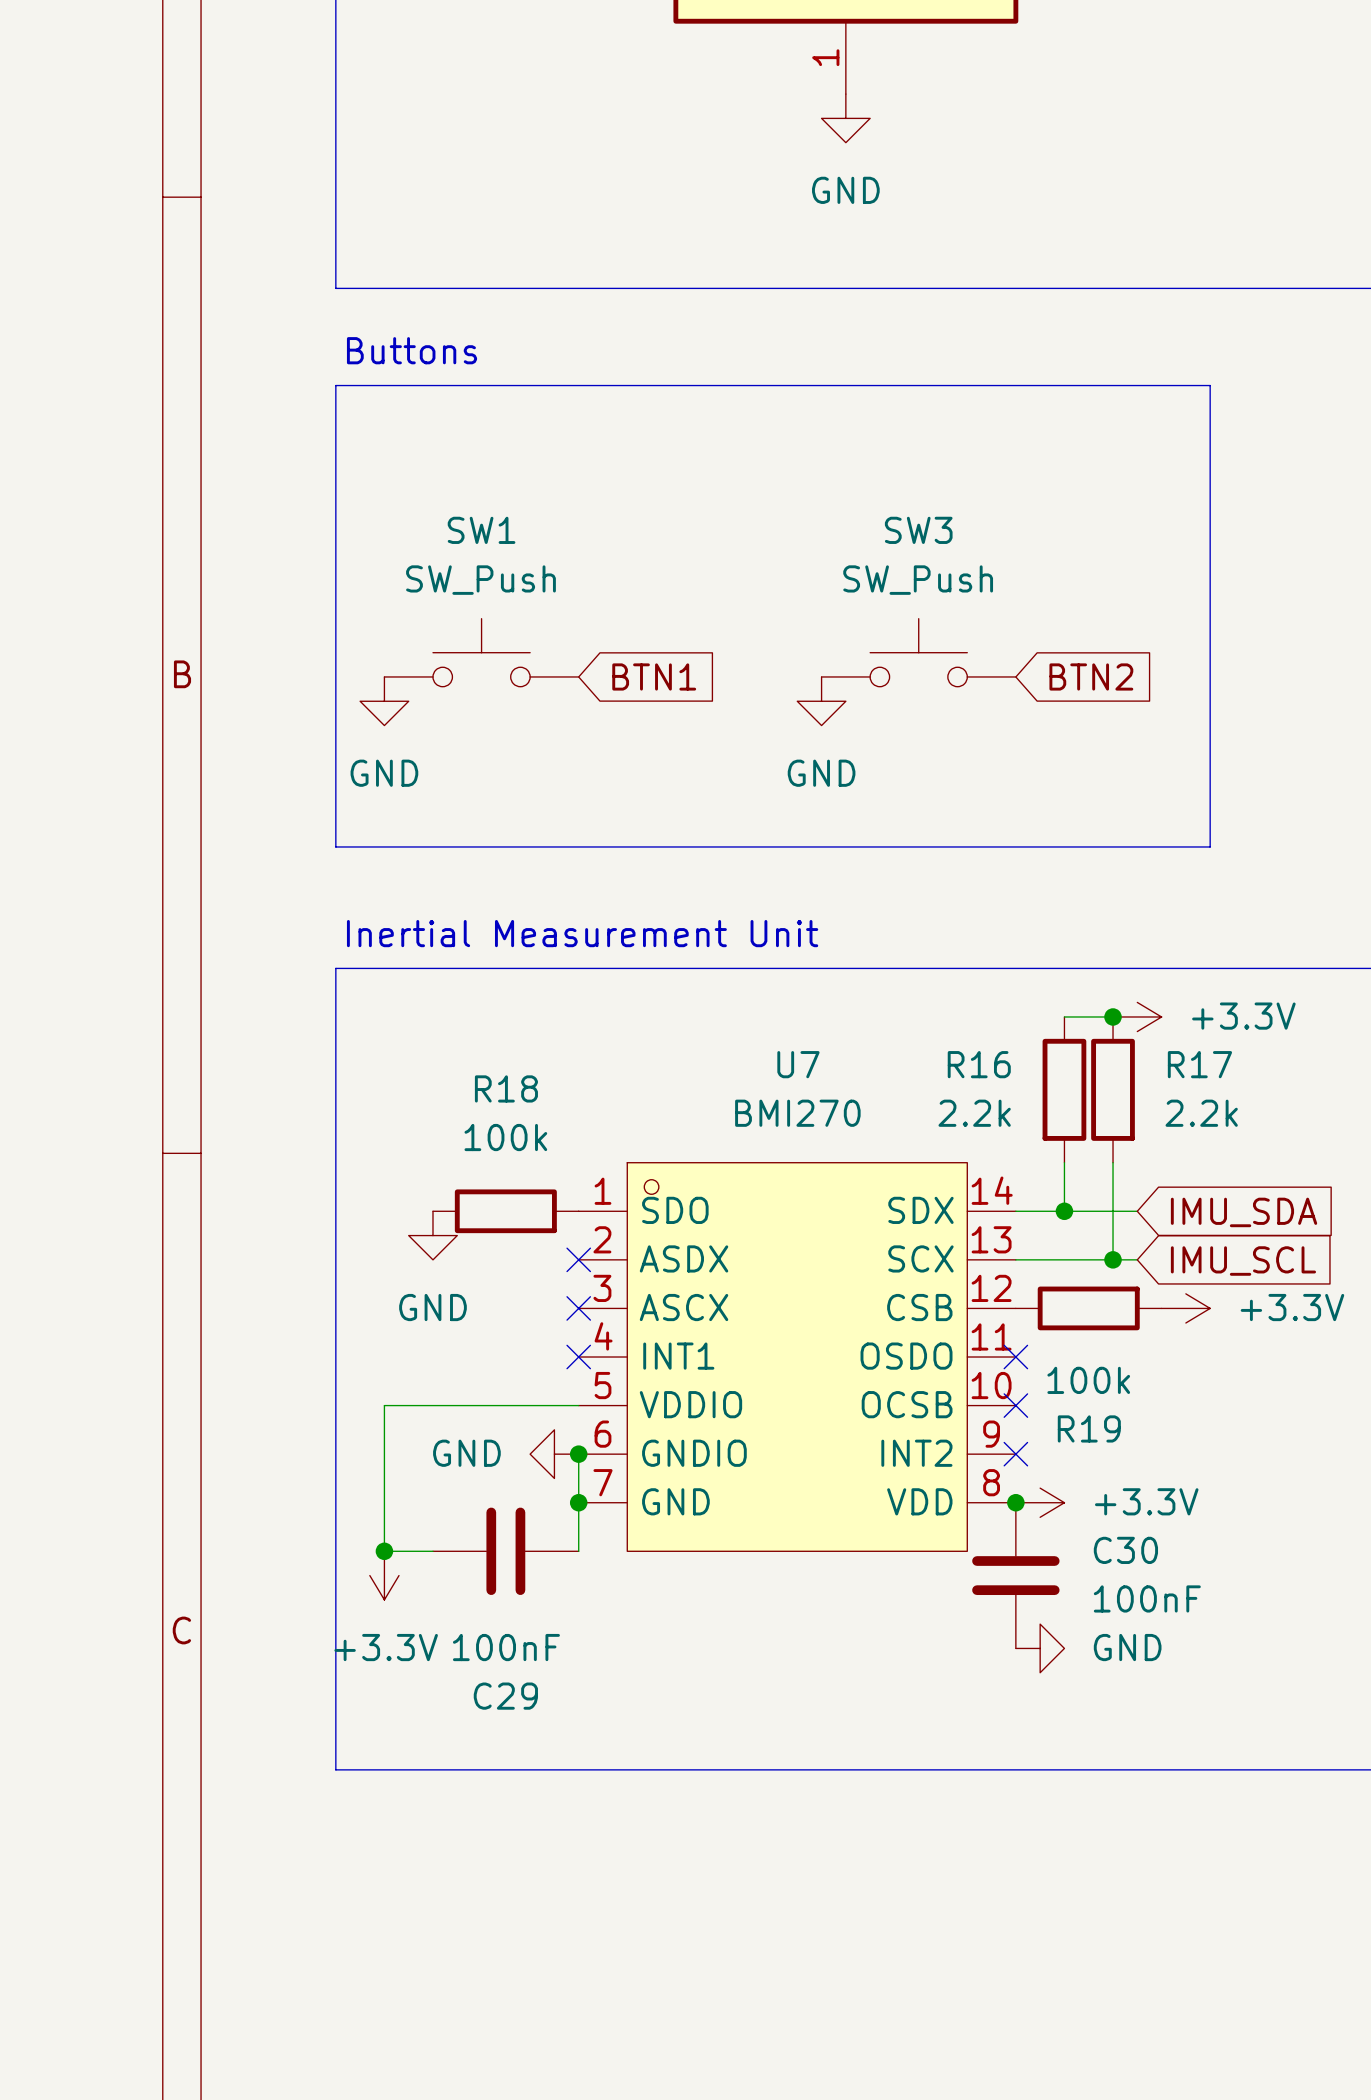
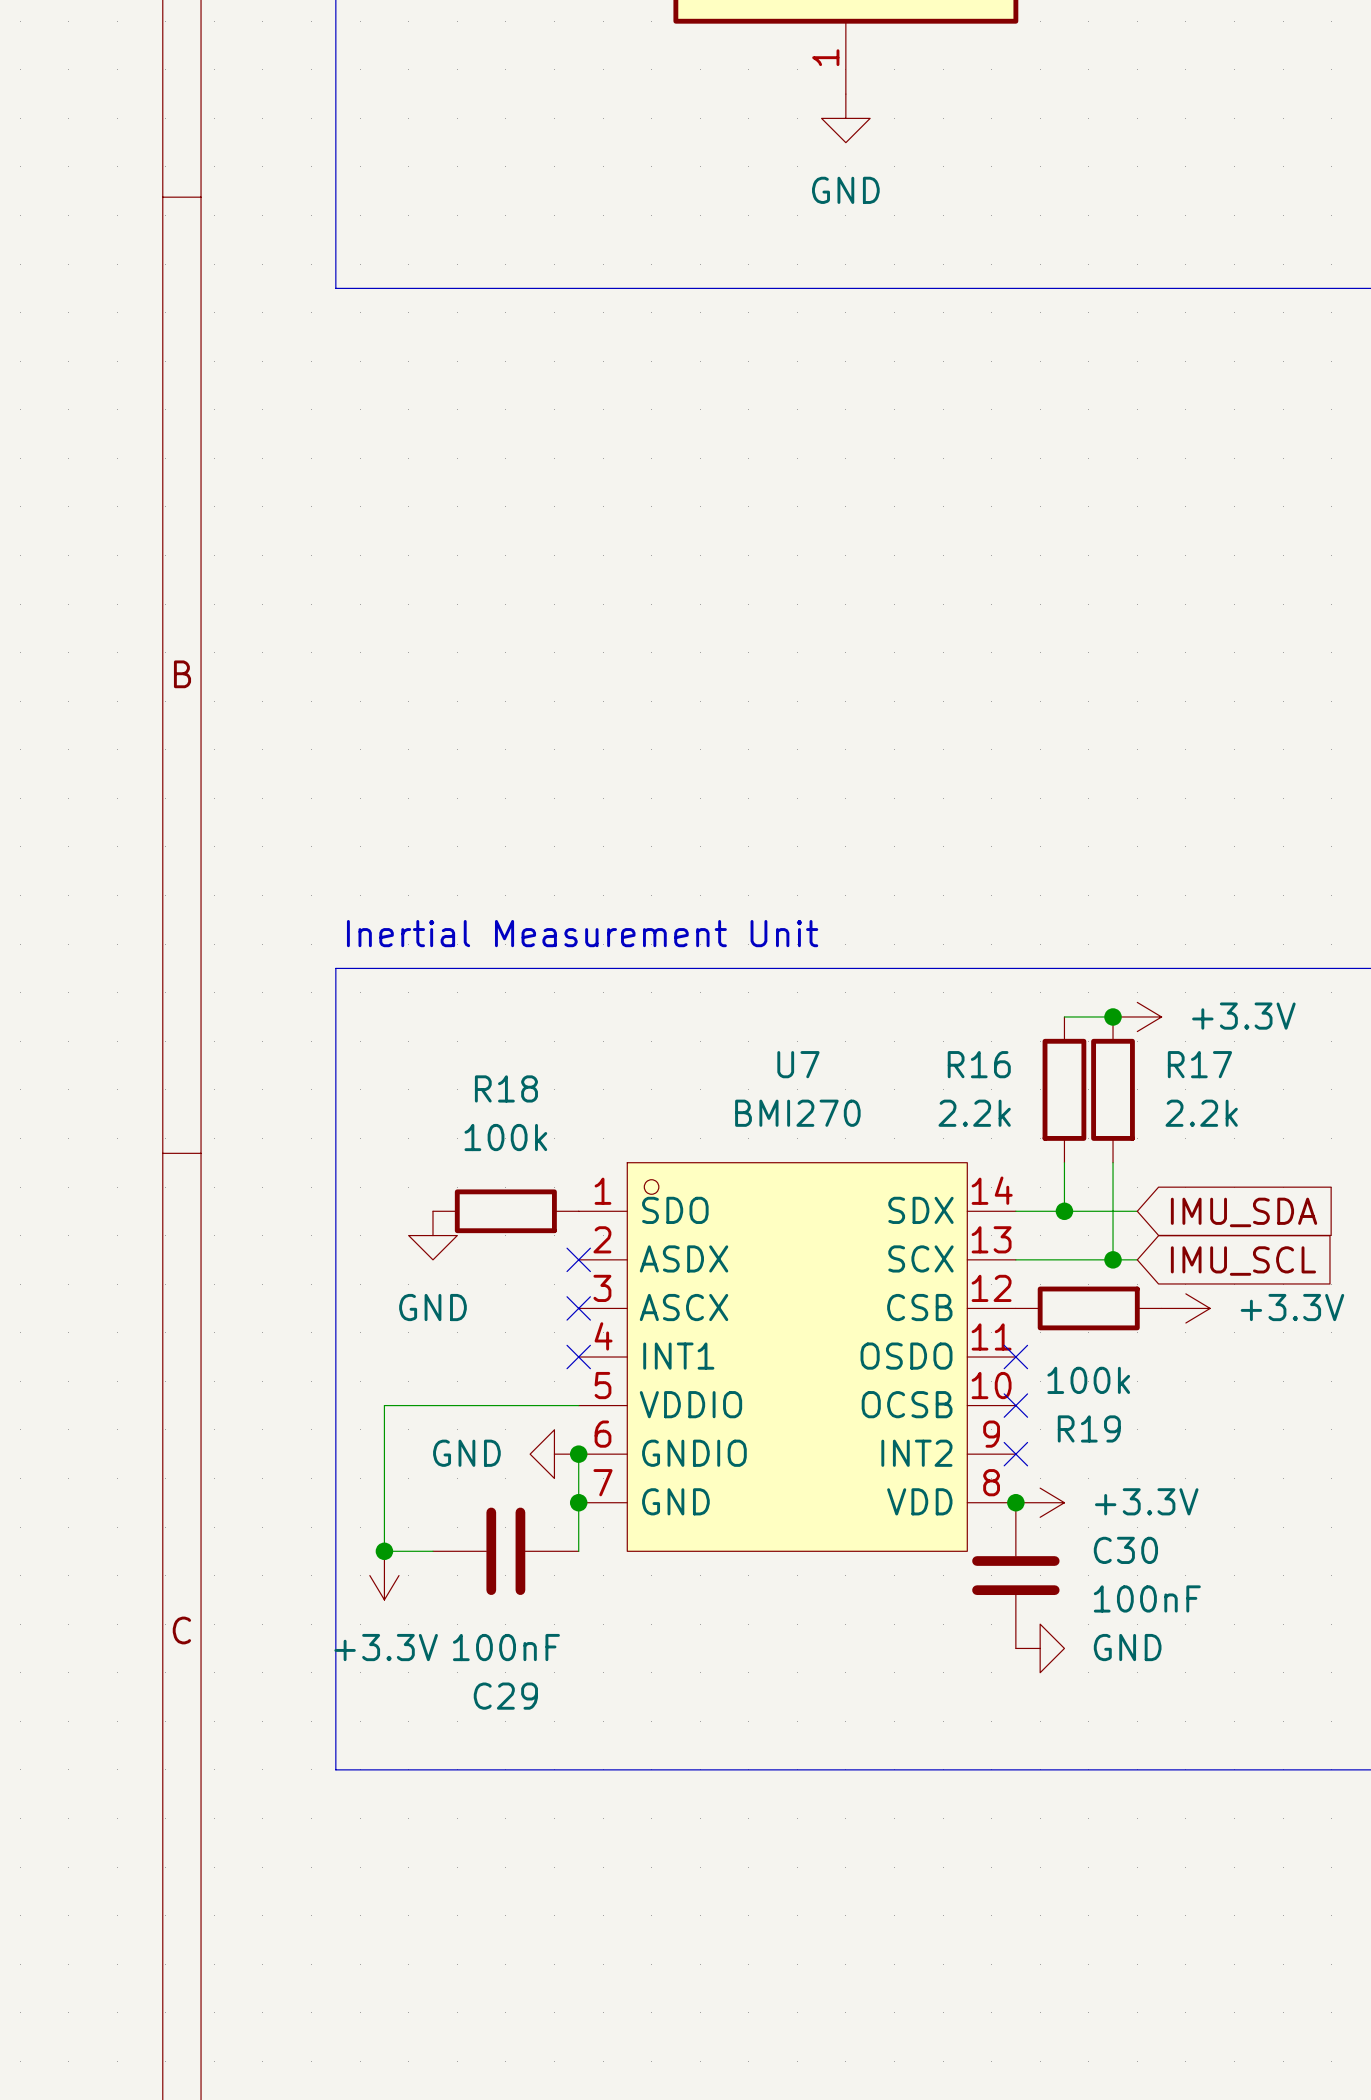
text: Buttons (412, 350) -> none
line: (335, 385) (1210, 385) (1210, 846) (335, 846) (335, 385) -> none
SW1: SW_Push (481, 652) -> none
SW3: SW_Push (918, 652) -> none
global label: BTN1 (654, 676) -> none
global label: BTN2 (1091, 676) -> none
power symbol: GND (384, 701) -> none
power symbol: GND (821, 701) -> none

